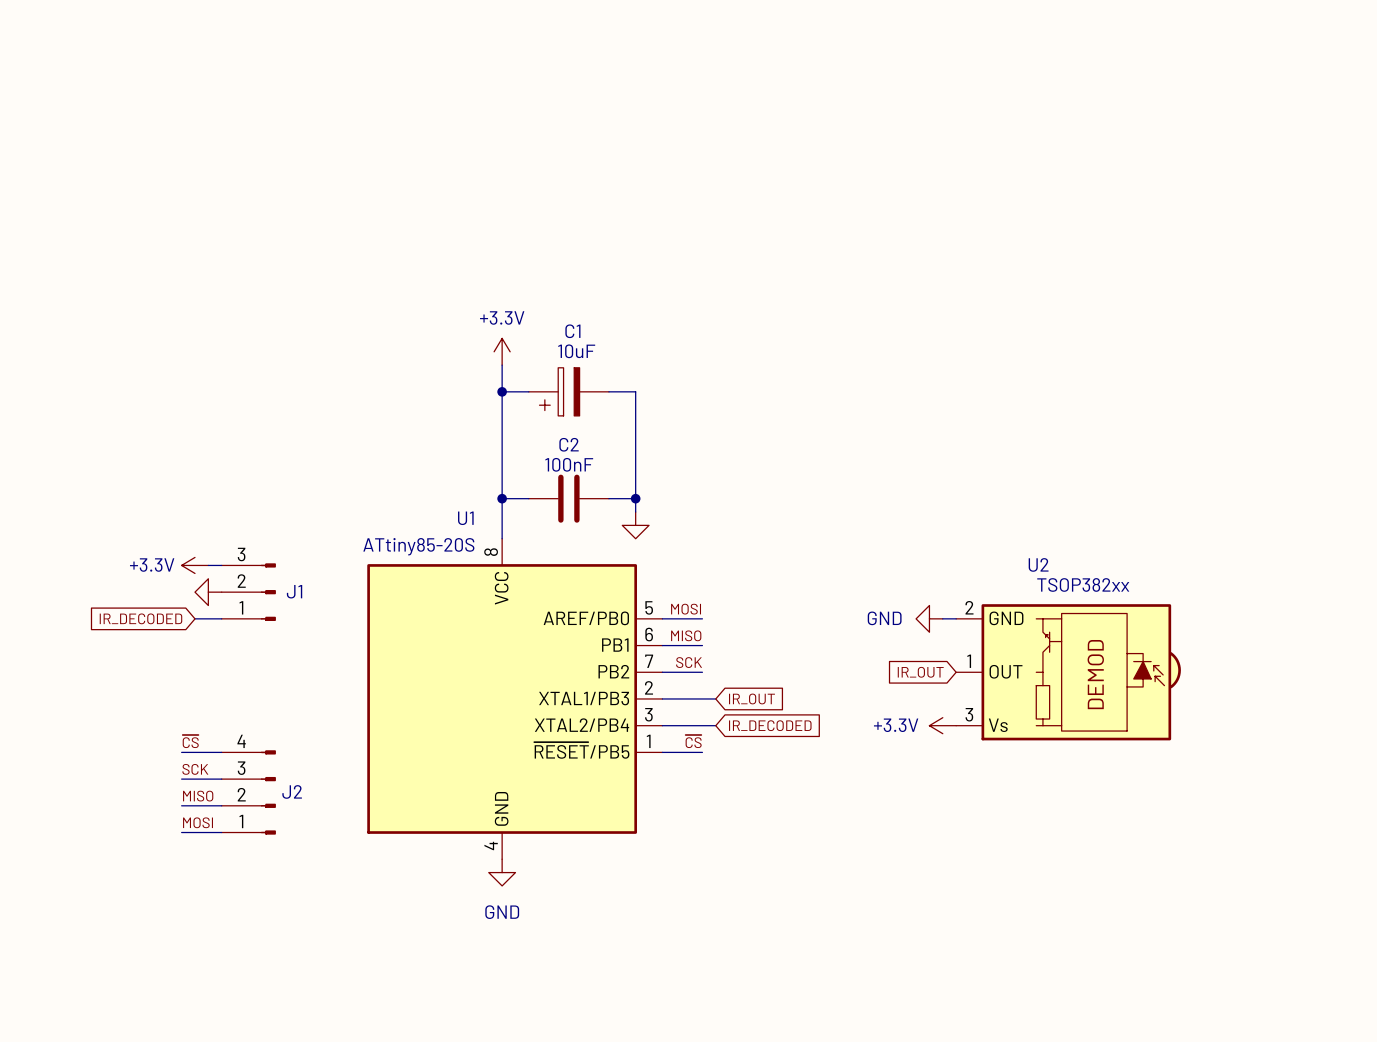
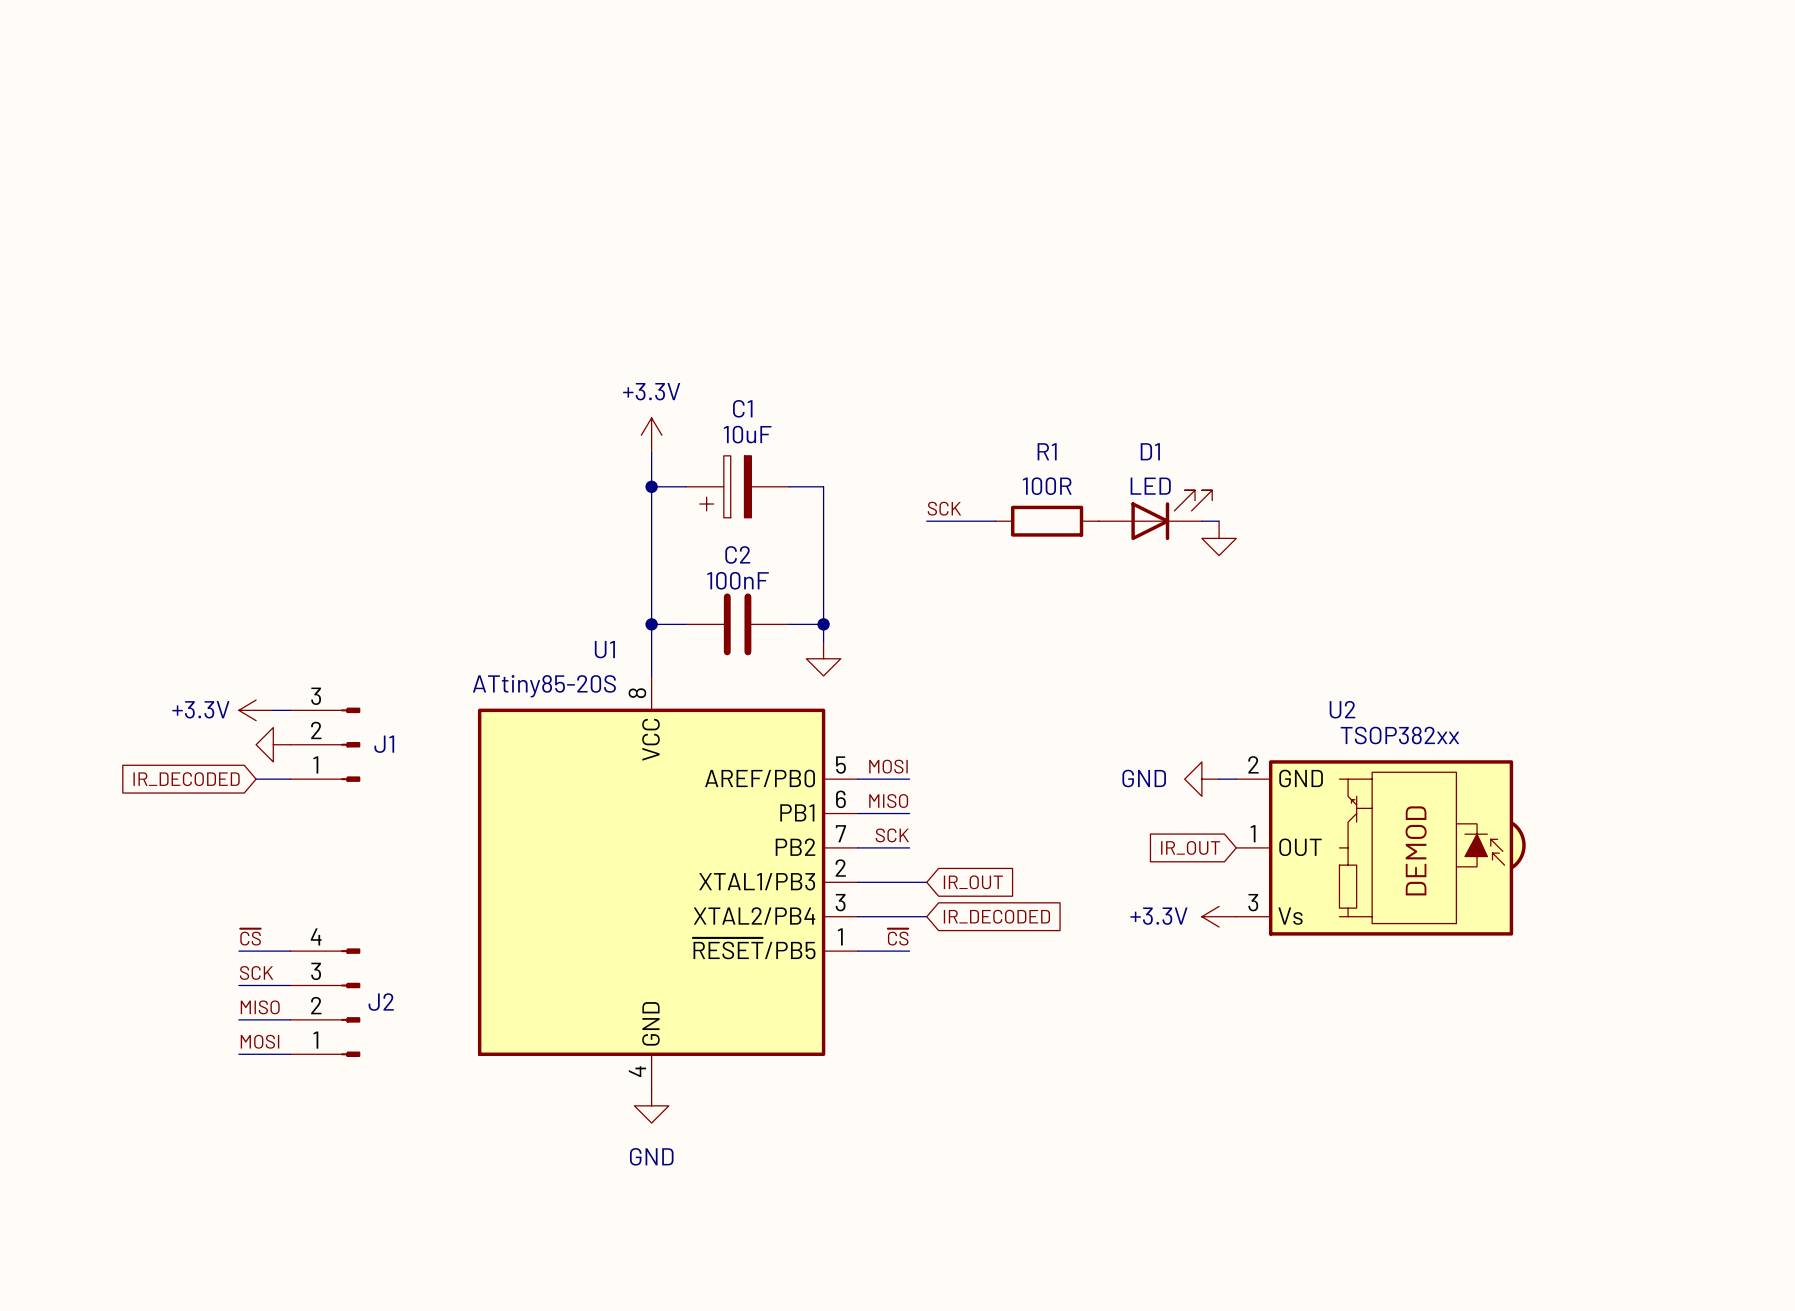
label: none -> SCK (944, 508)
D1: none -> LED (1155, 515)
wire: none -> (926, 521) (995, 521)
R1: none -> 100R (1047, 521)
wire: none -> (1201, 521) (1219, 521)
power symbol: none -> (1219, 538)

